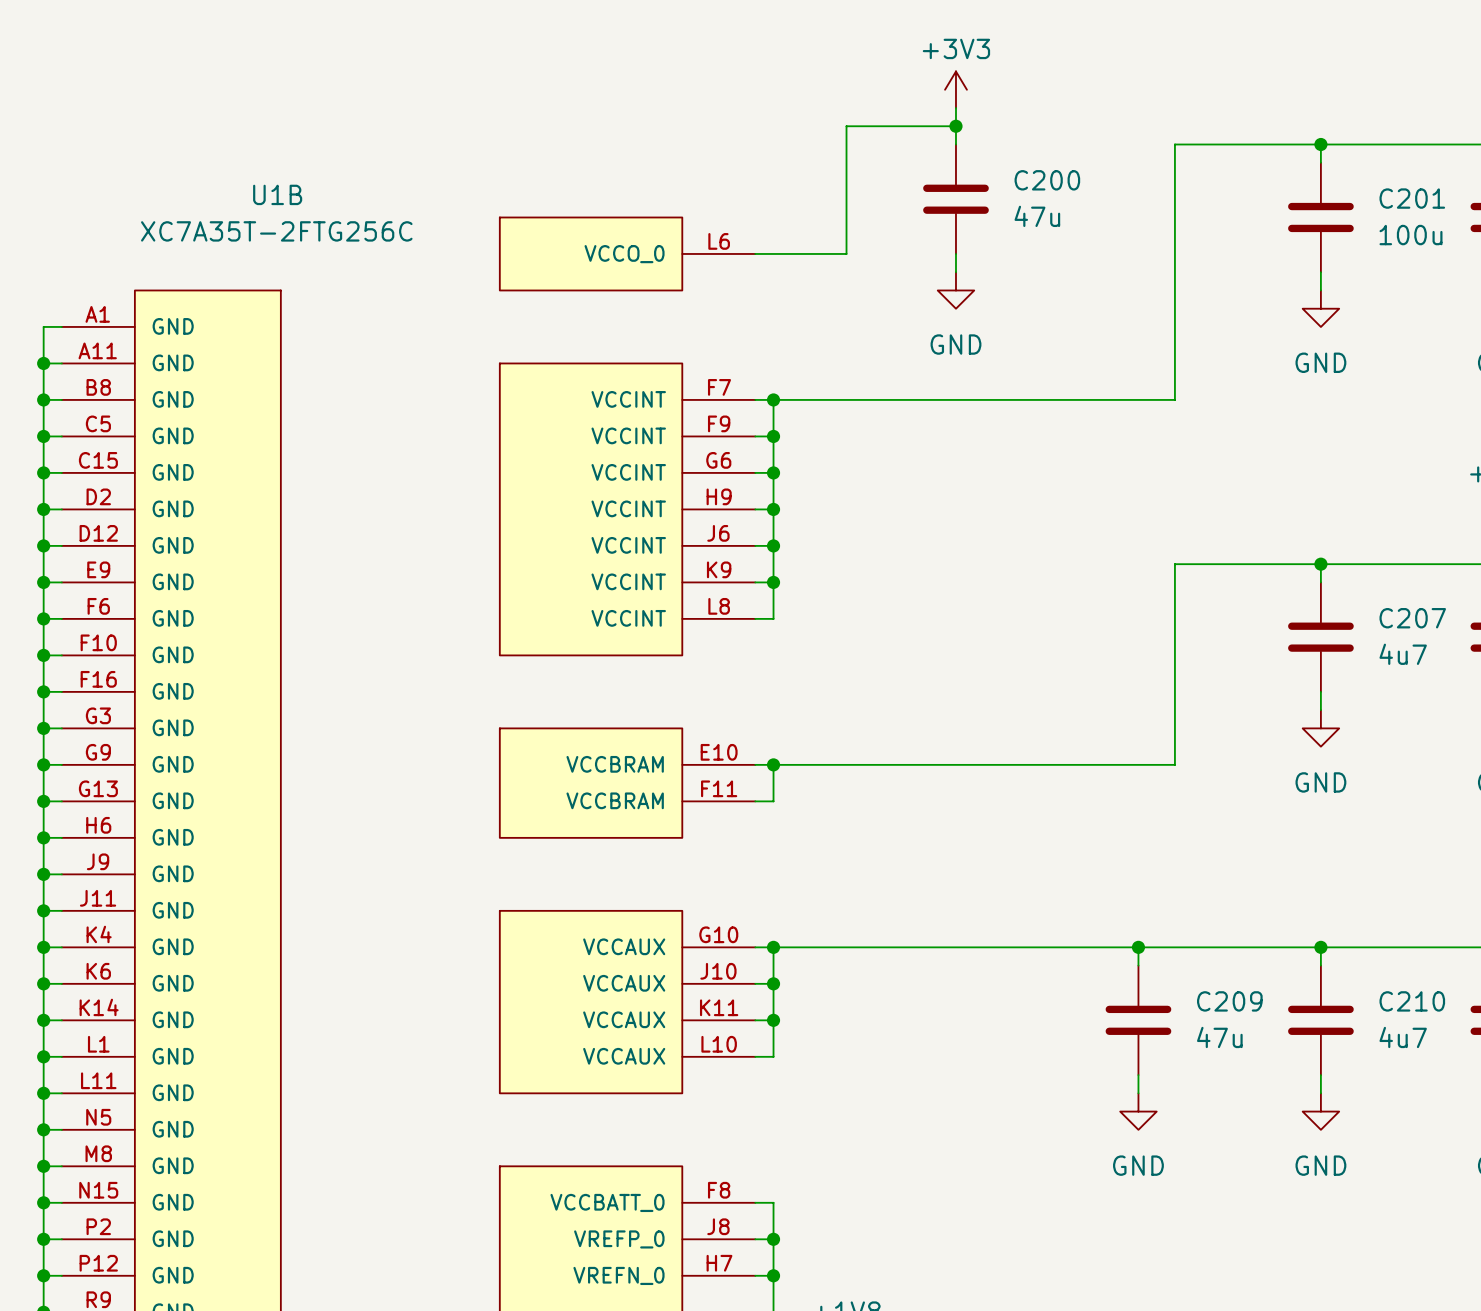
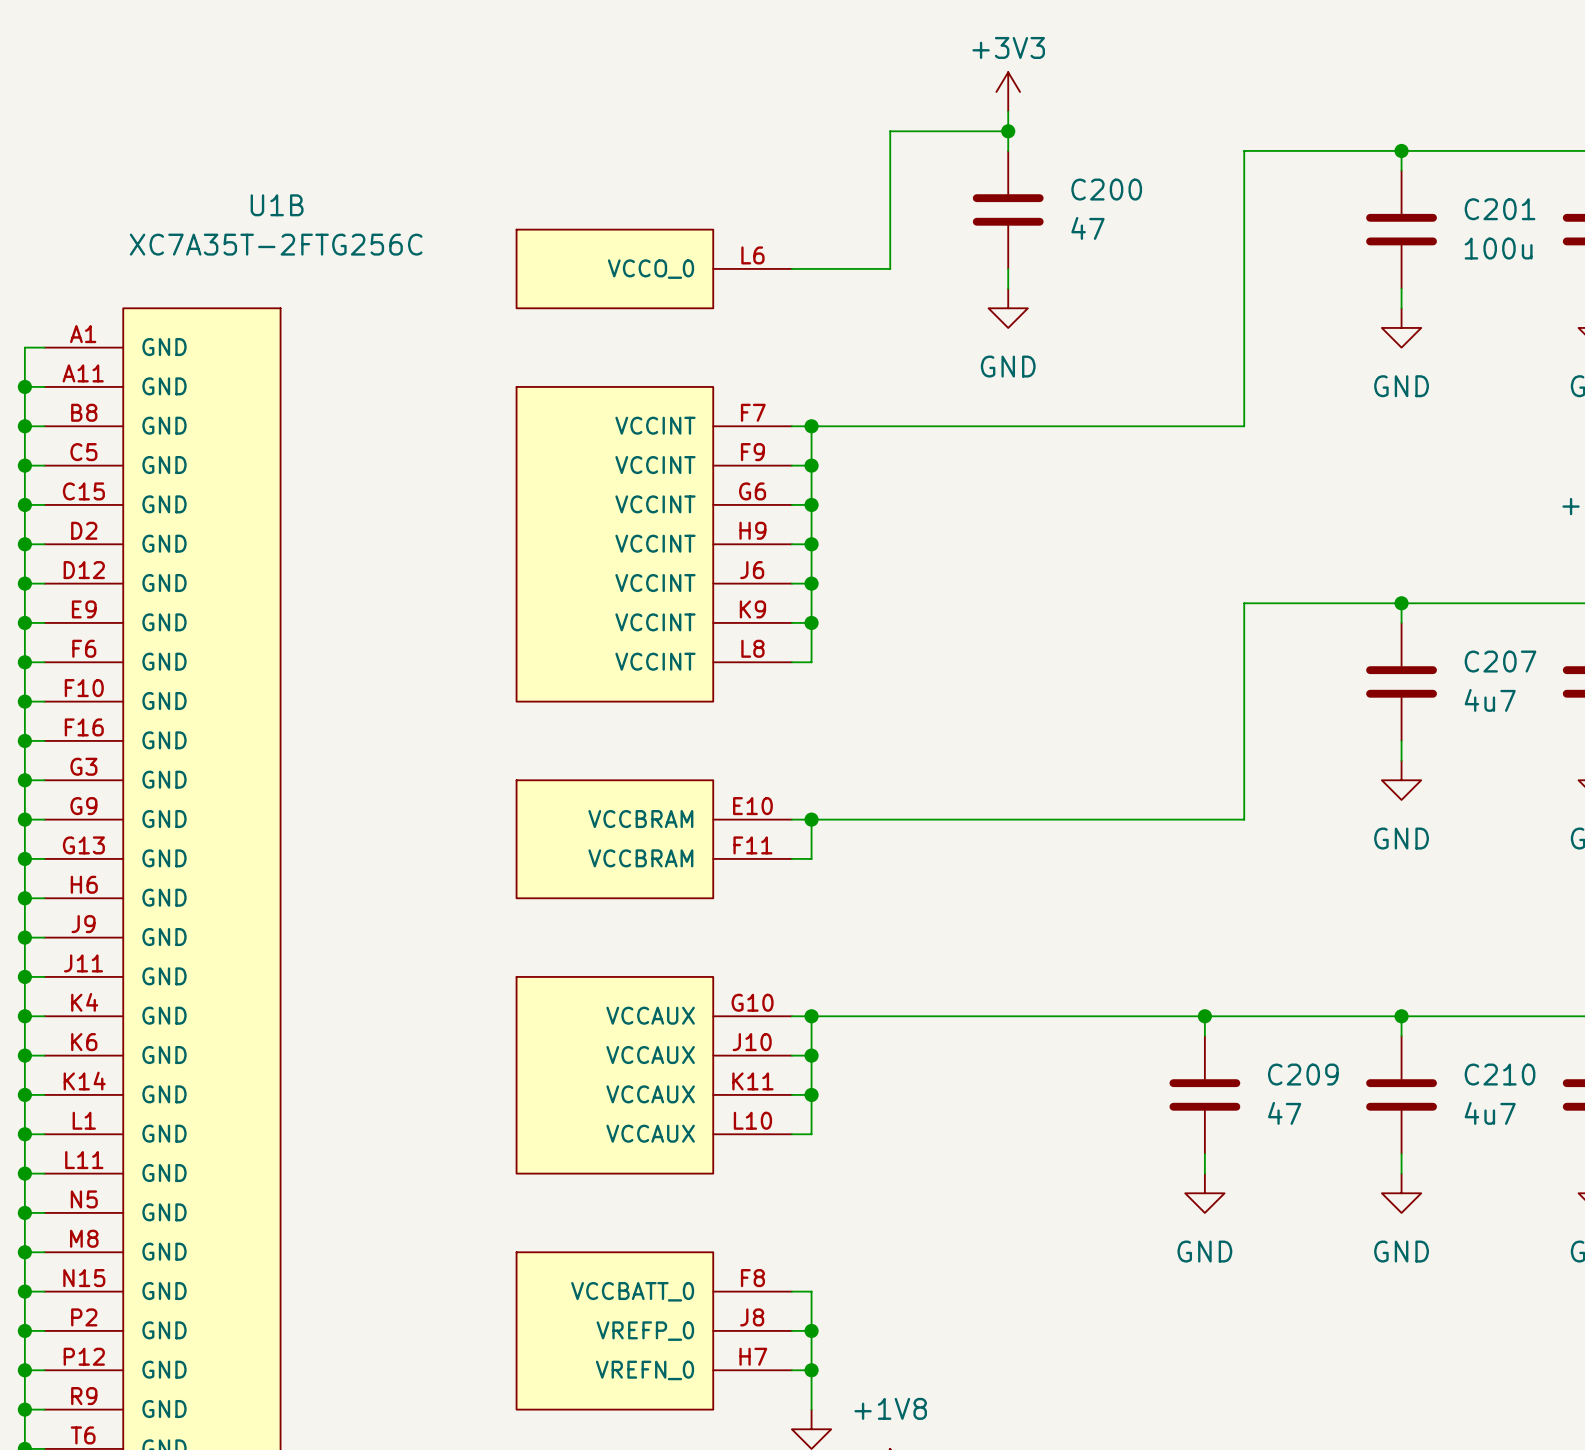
C200 value: 47u (1037, 216) -> 47 (1087, 228)
C209 value: 47u (1219, 1037) -> 47 (1284, 1113)

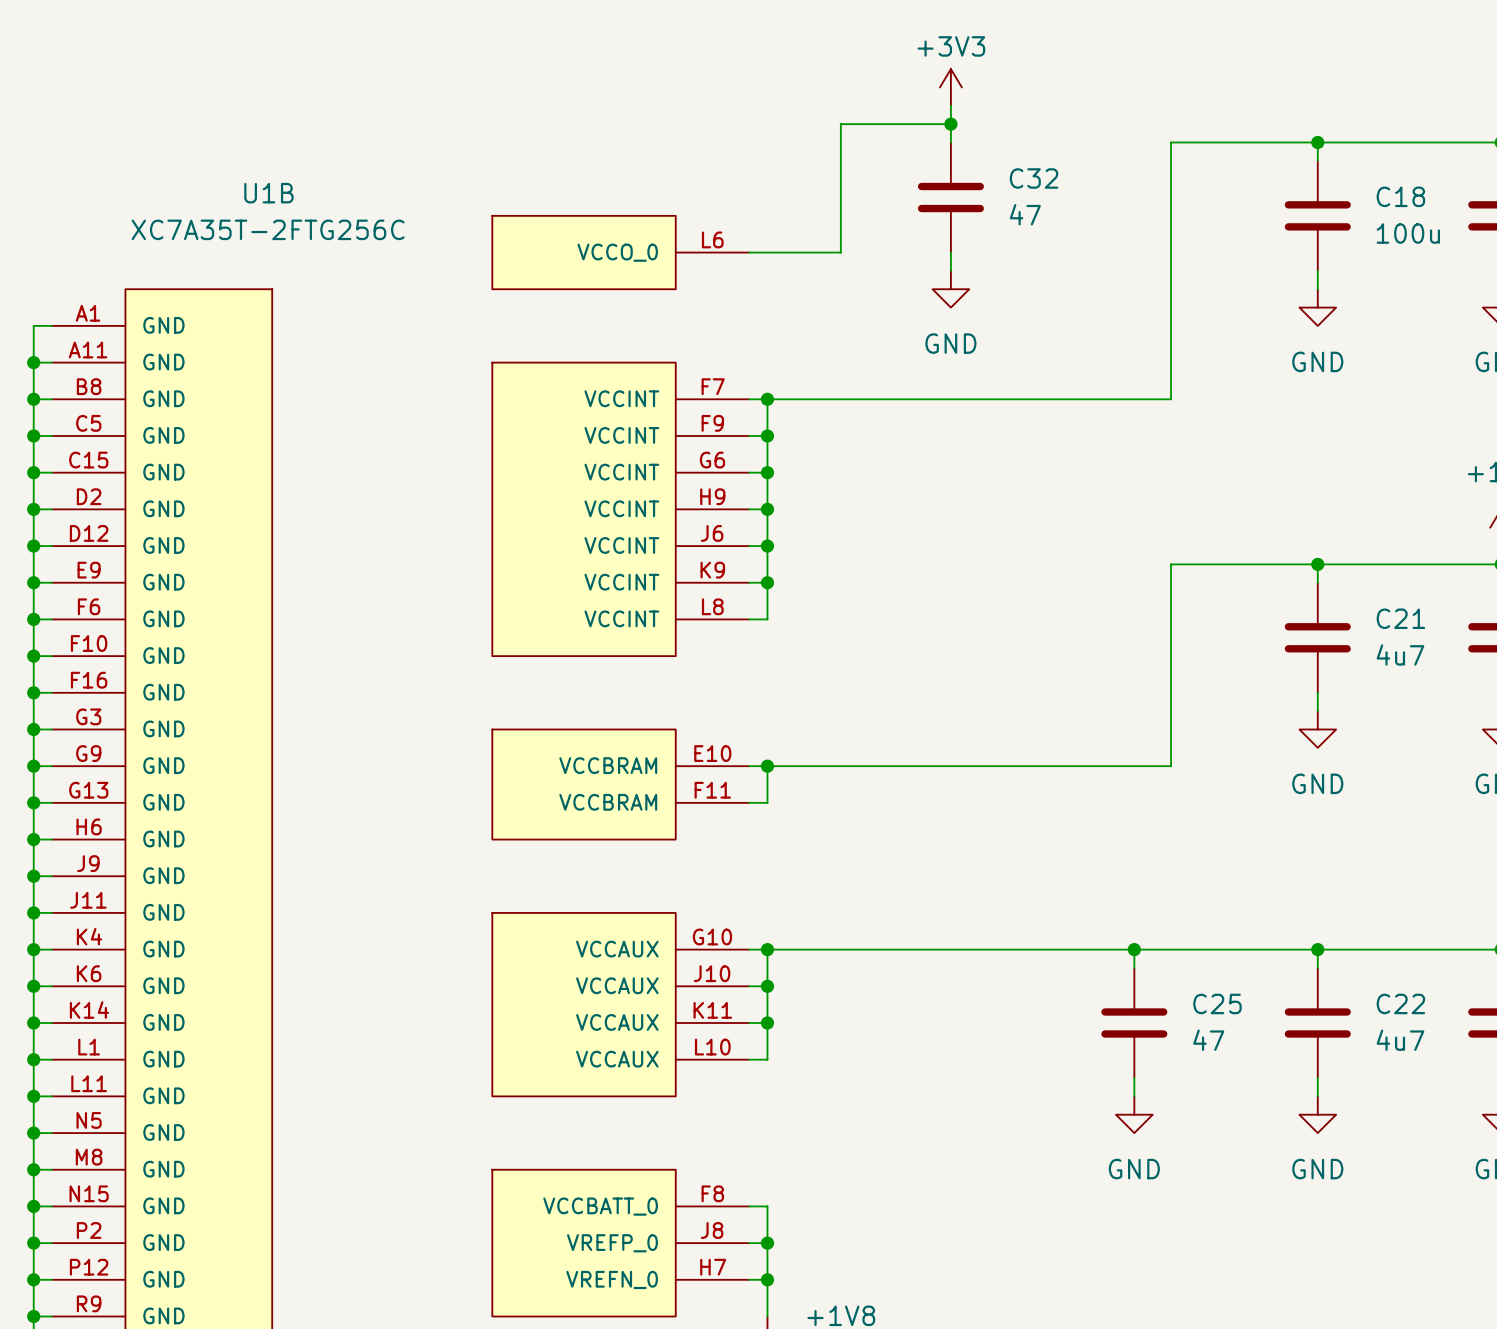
C200 name: C200 (1106, 189) -> C32 (1034, 178)
C201 name: C201 (1500, 209) -> C18 (1400, 196)
C207 name: C207 (1500, 661) -> C21 (1400, 618)
C209 name: C209 (1303, 1074) -> C25 (1217, 1003)
C210 name: C210 (1500, 1074) -> C22 (1400, 1003)

